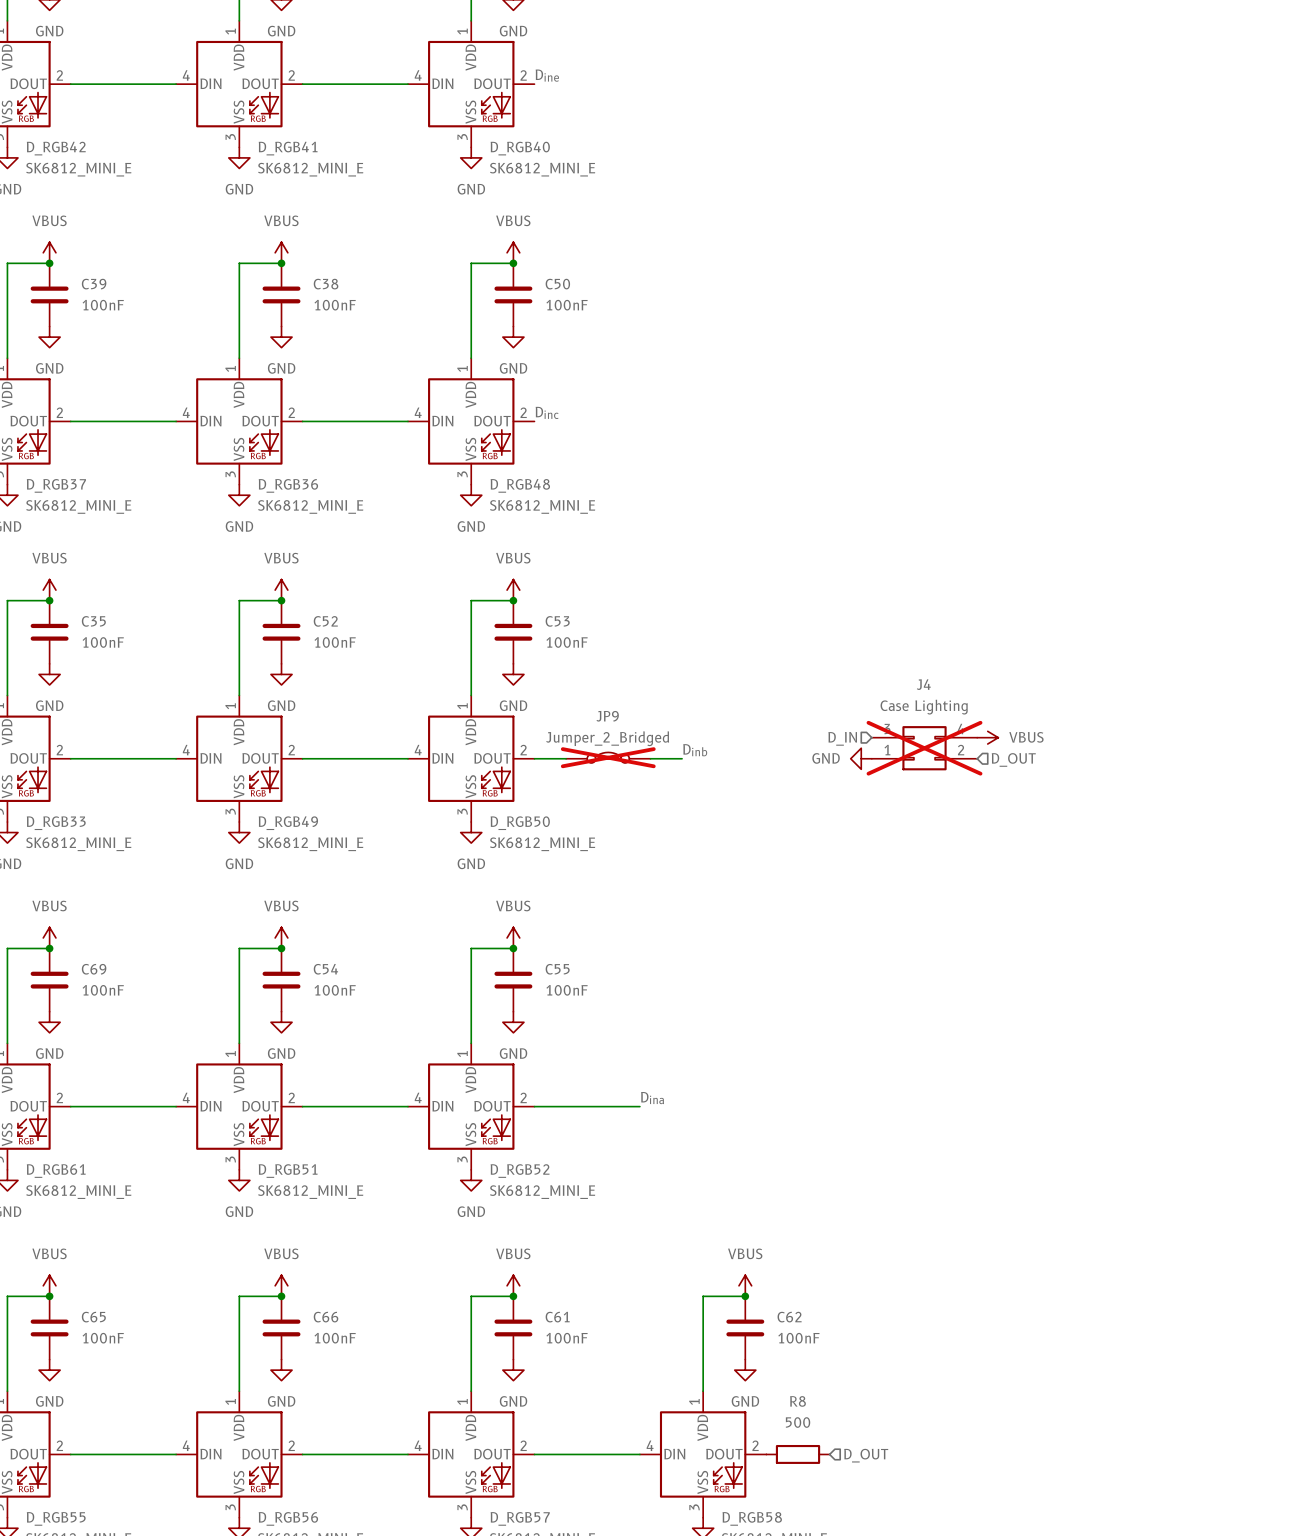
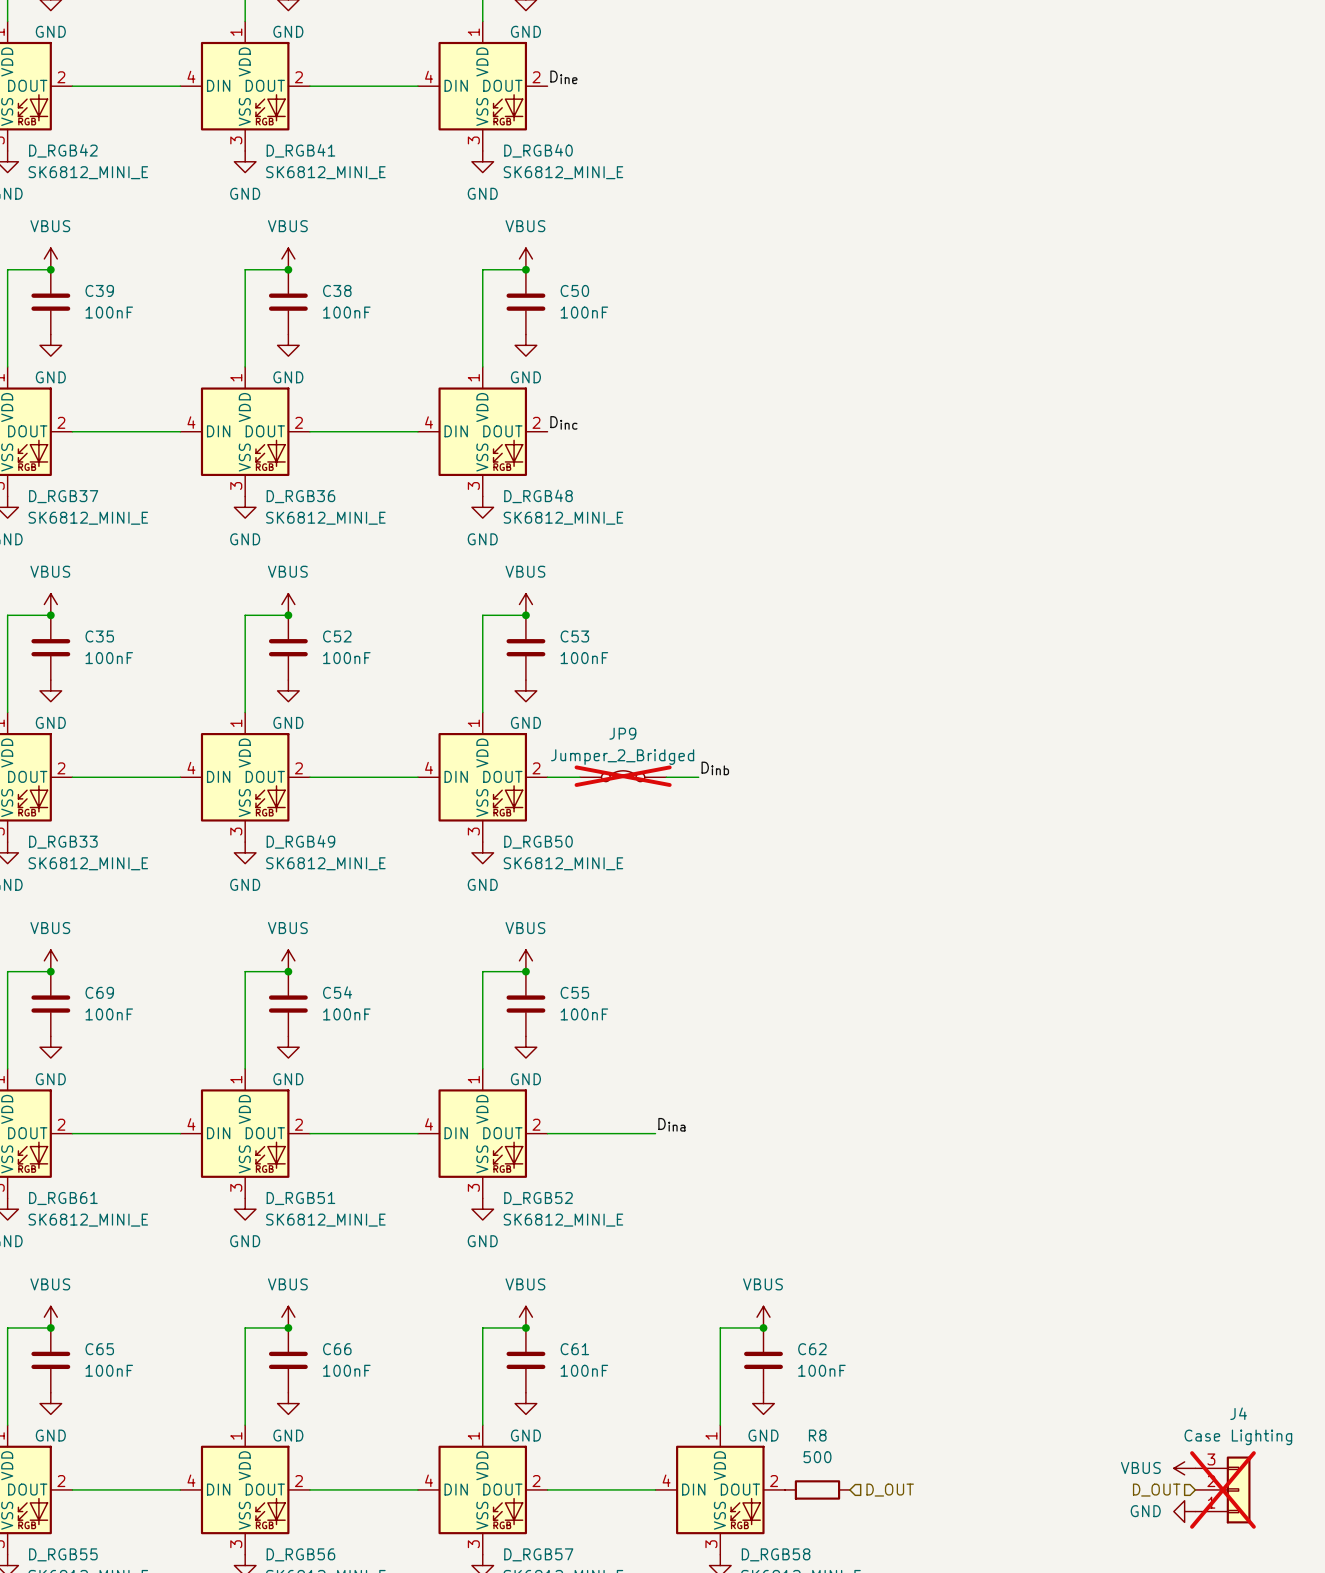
J4 name position: J4 (923, 684) -> J4 (1238, 1413)
J4 value position: Case Lighting (924, 707) -> Case Lighting (1238, 1437)
J4 symbol: [871, 726, 978, 771] -> [1195, 1456, 1251, 1524]
power symbol: VBUS (987, 737) -> none
hierarchical label: D_IN (842, 738) -> none
power symbol: GND (861, 758) -> none
hierarchical label: D_OUT (1013, 759) -> none
power symbol: none -> VBUS (1184, 1468)
hierarchical label: none -> D_OUT (1156, 1490)
power symbol: none -> GND (1184, 1511)

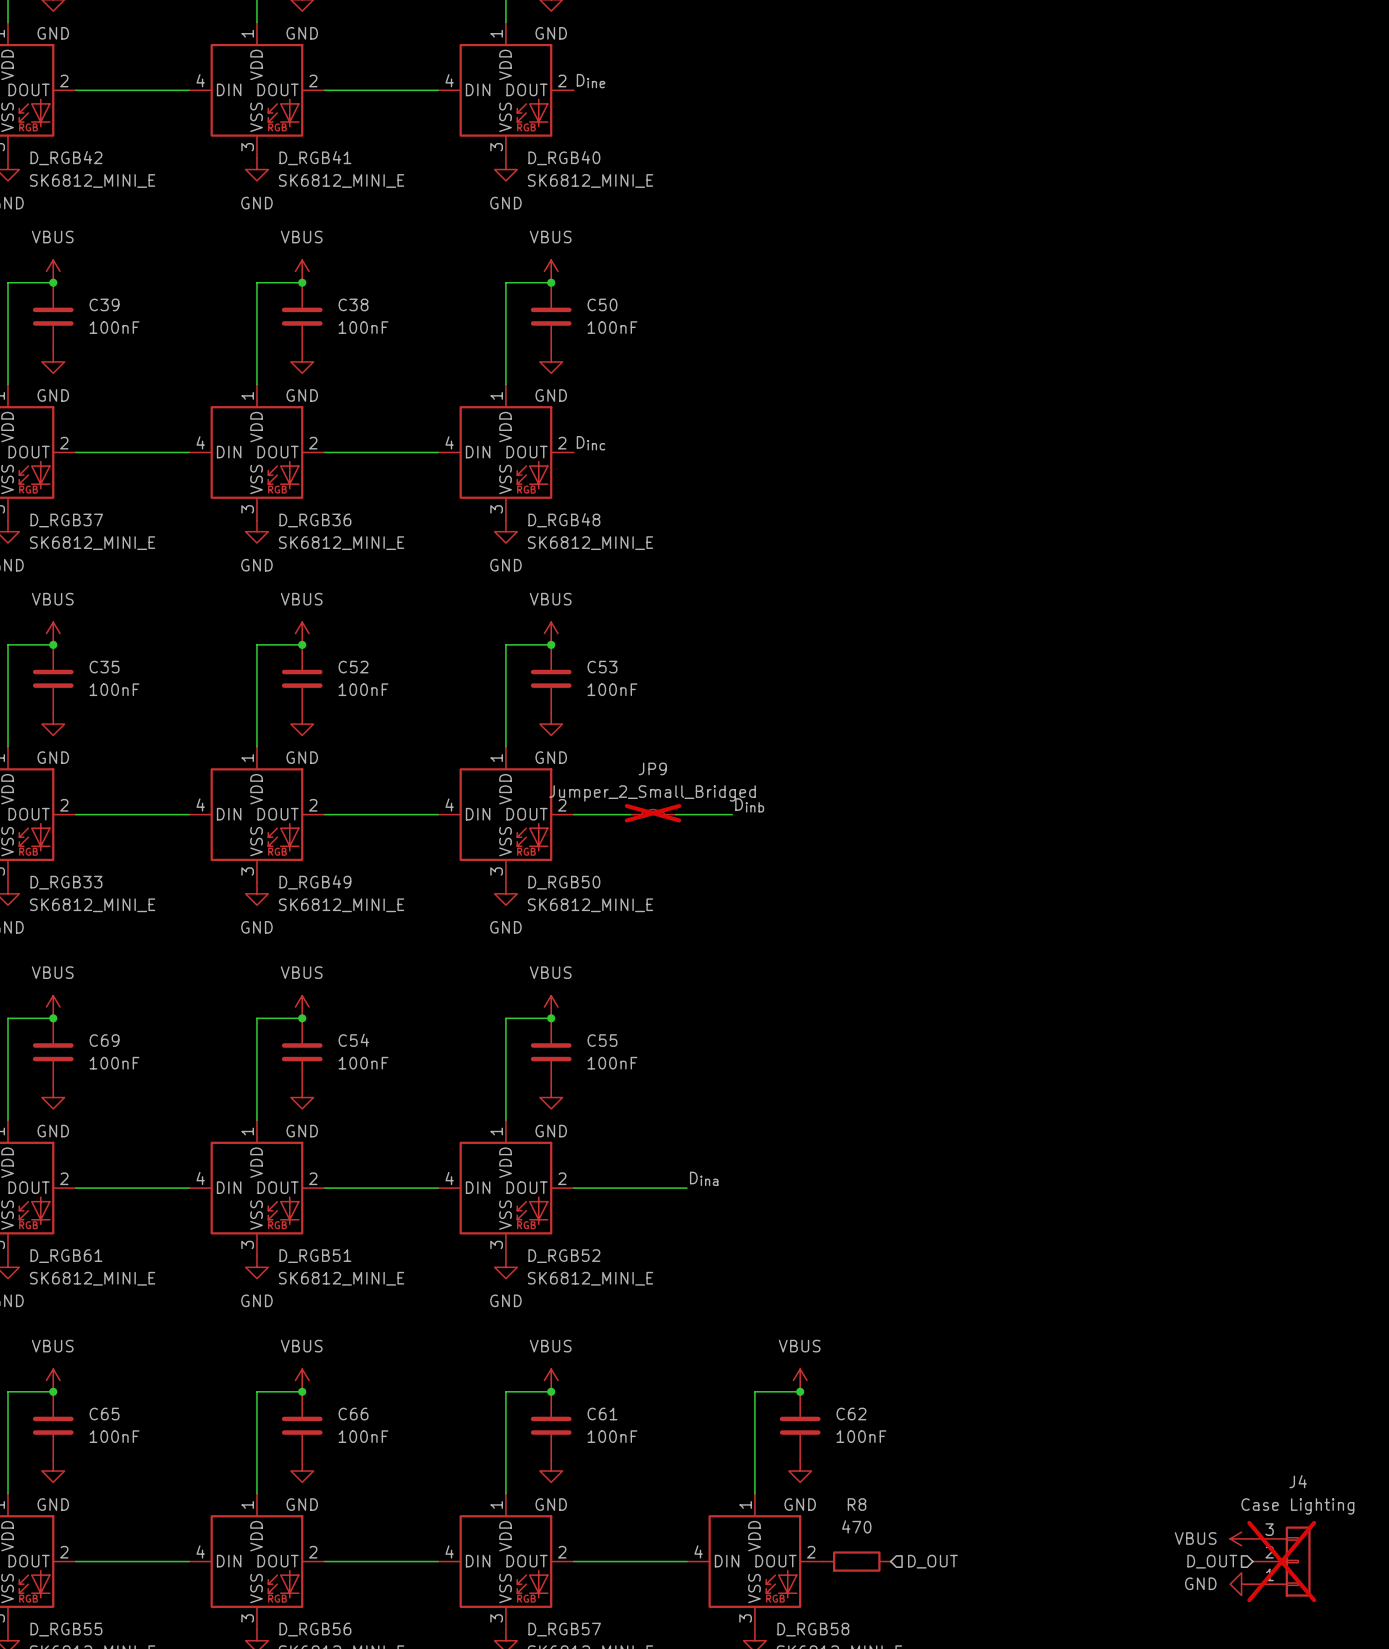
JP9 value: Jumper_2_Bridged (622, 757) -> Jumper_2_Small_Bridged (652, 793)
JP9 symbol: [579, 770, 667, 782] -> [630, 809, 676, 817]
R8 value: 500 (817, 1457) -> 470 (856, 1526)

